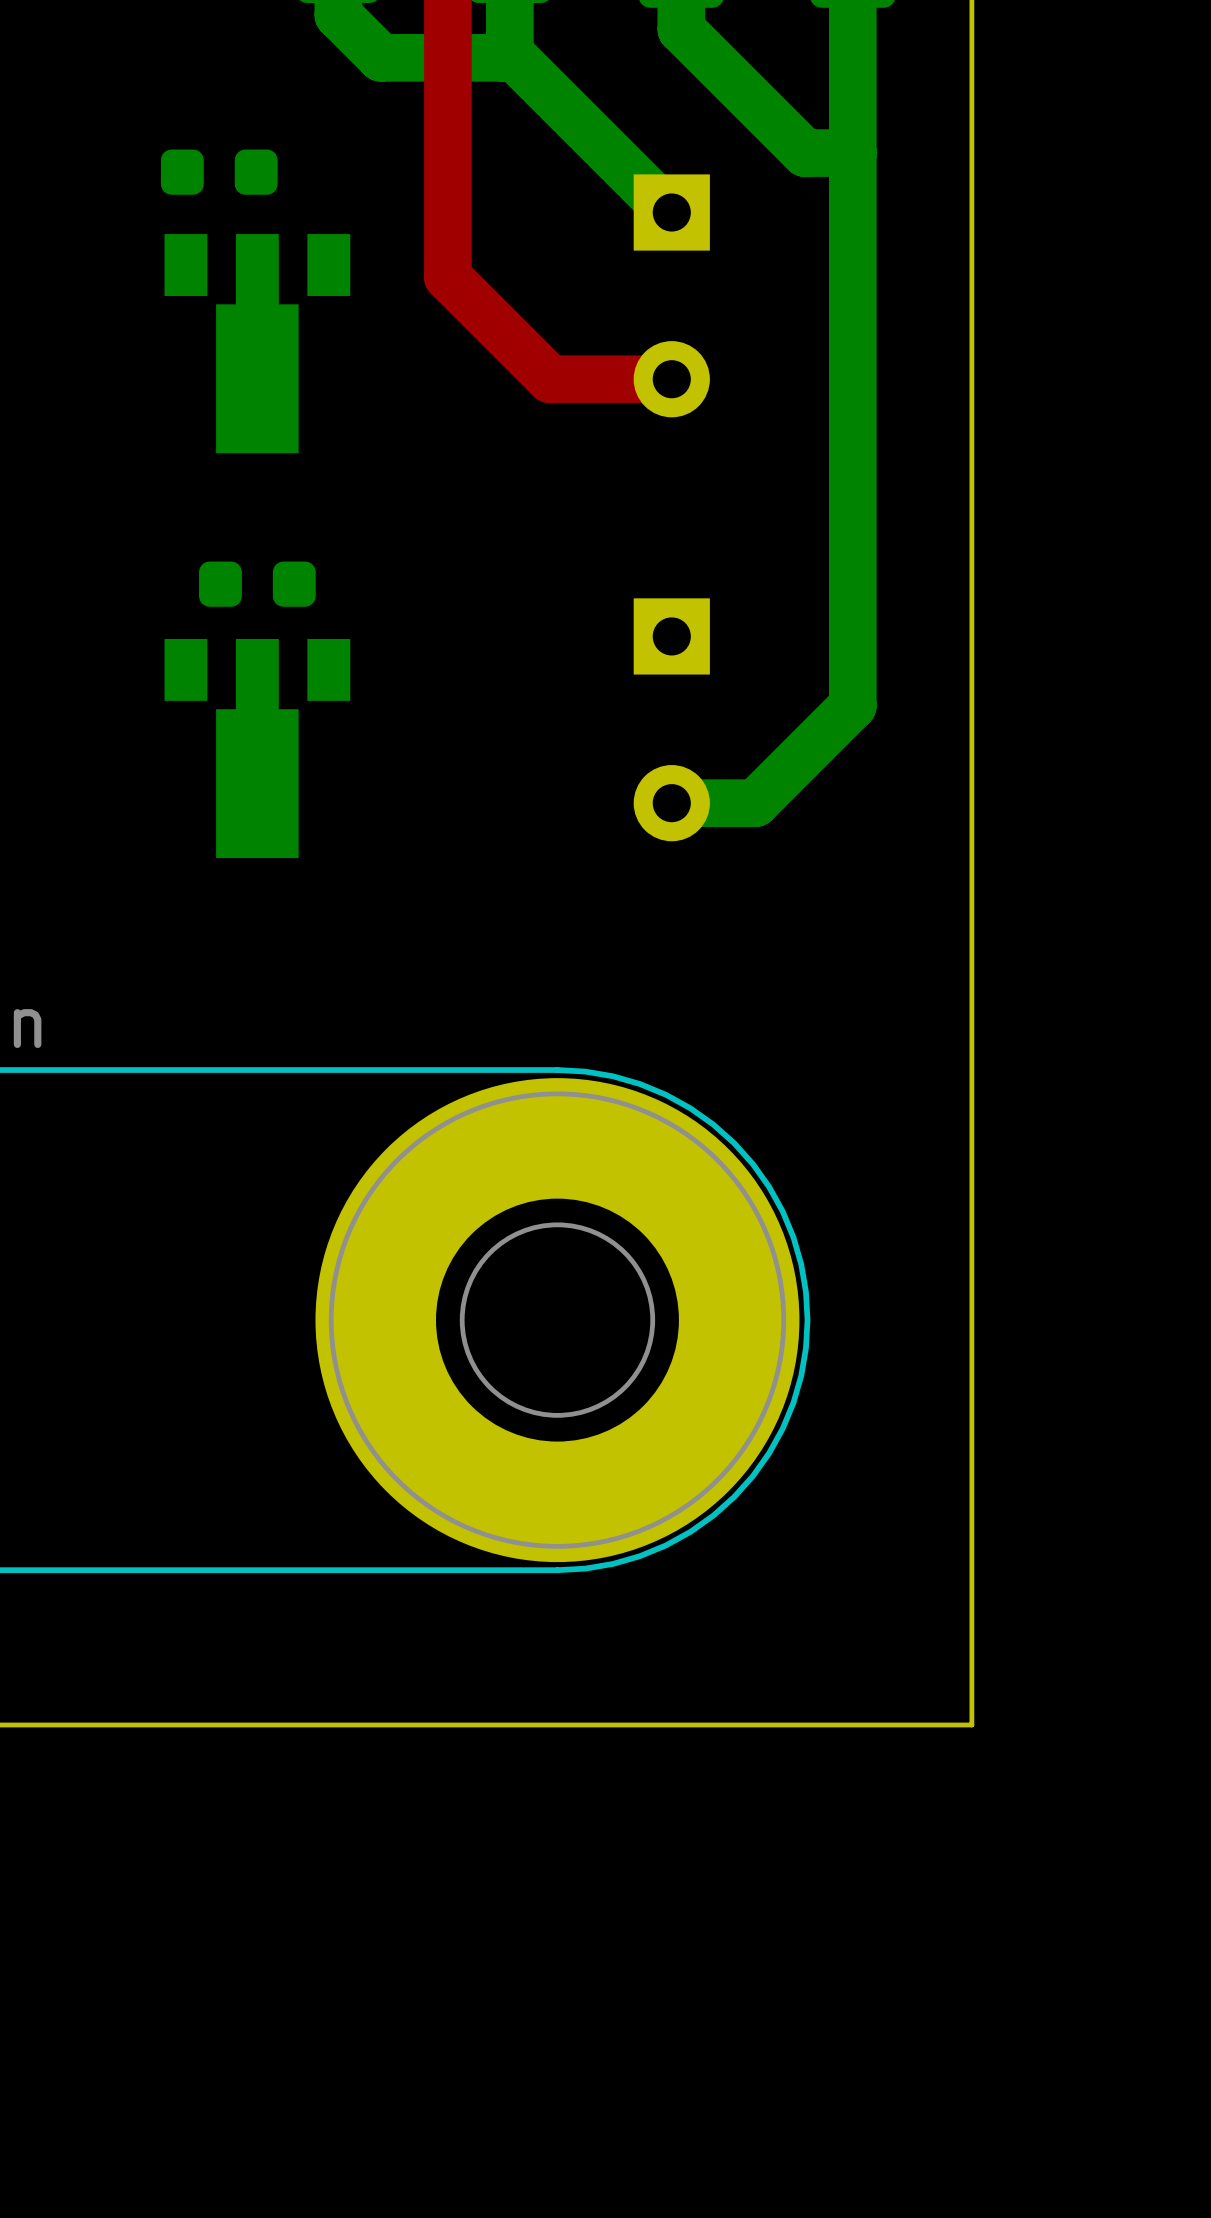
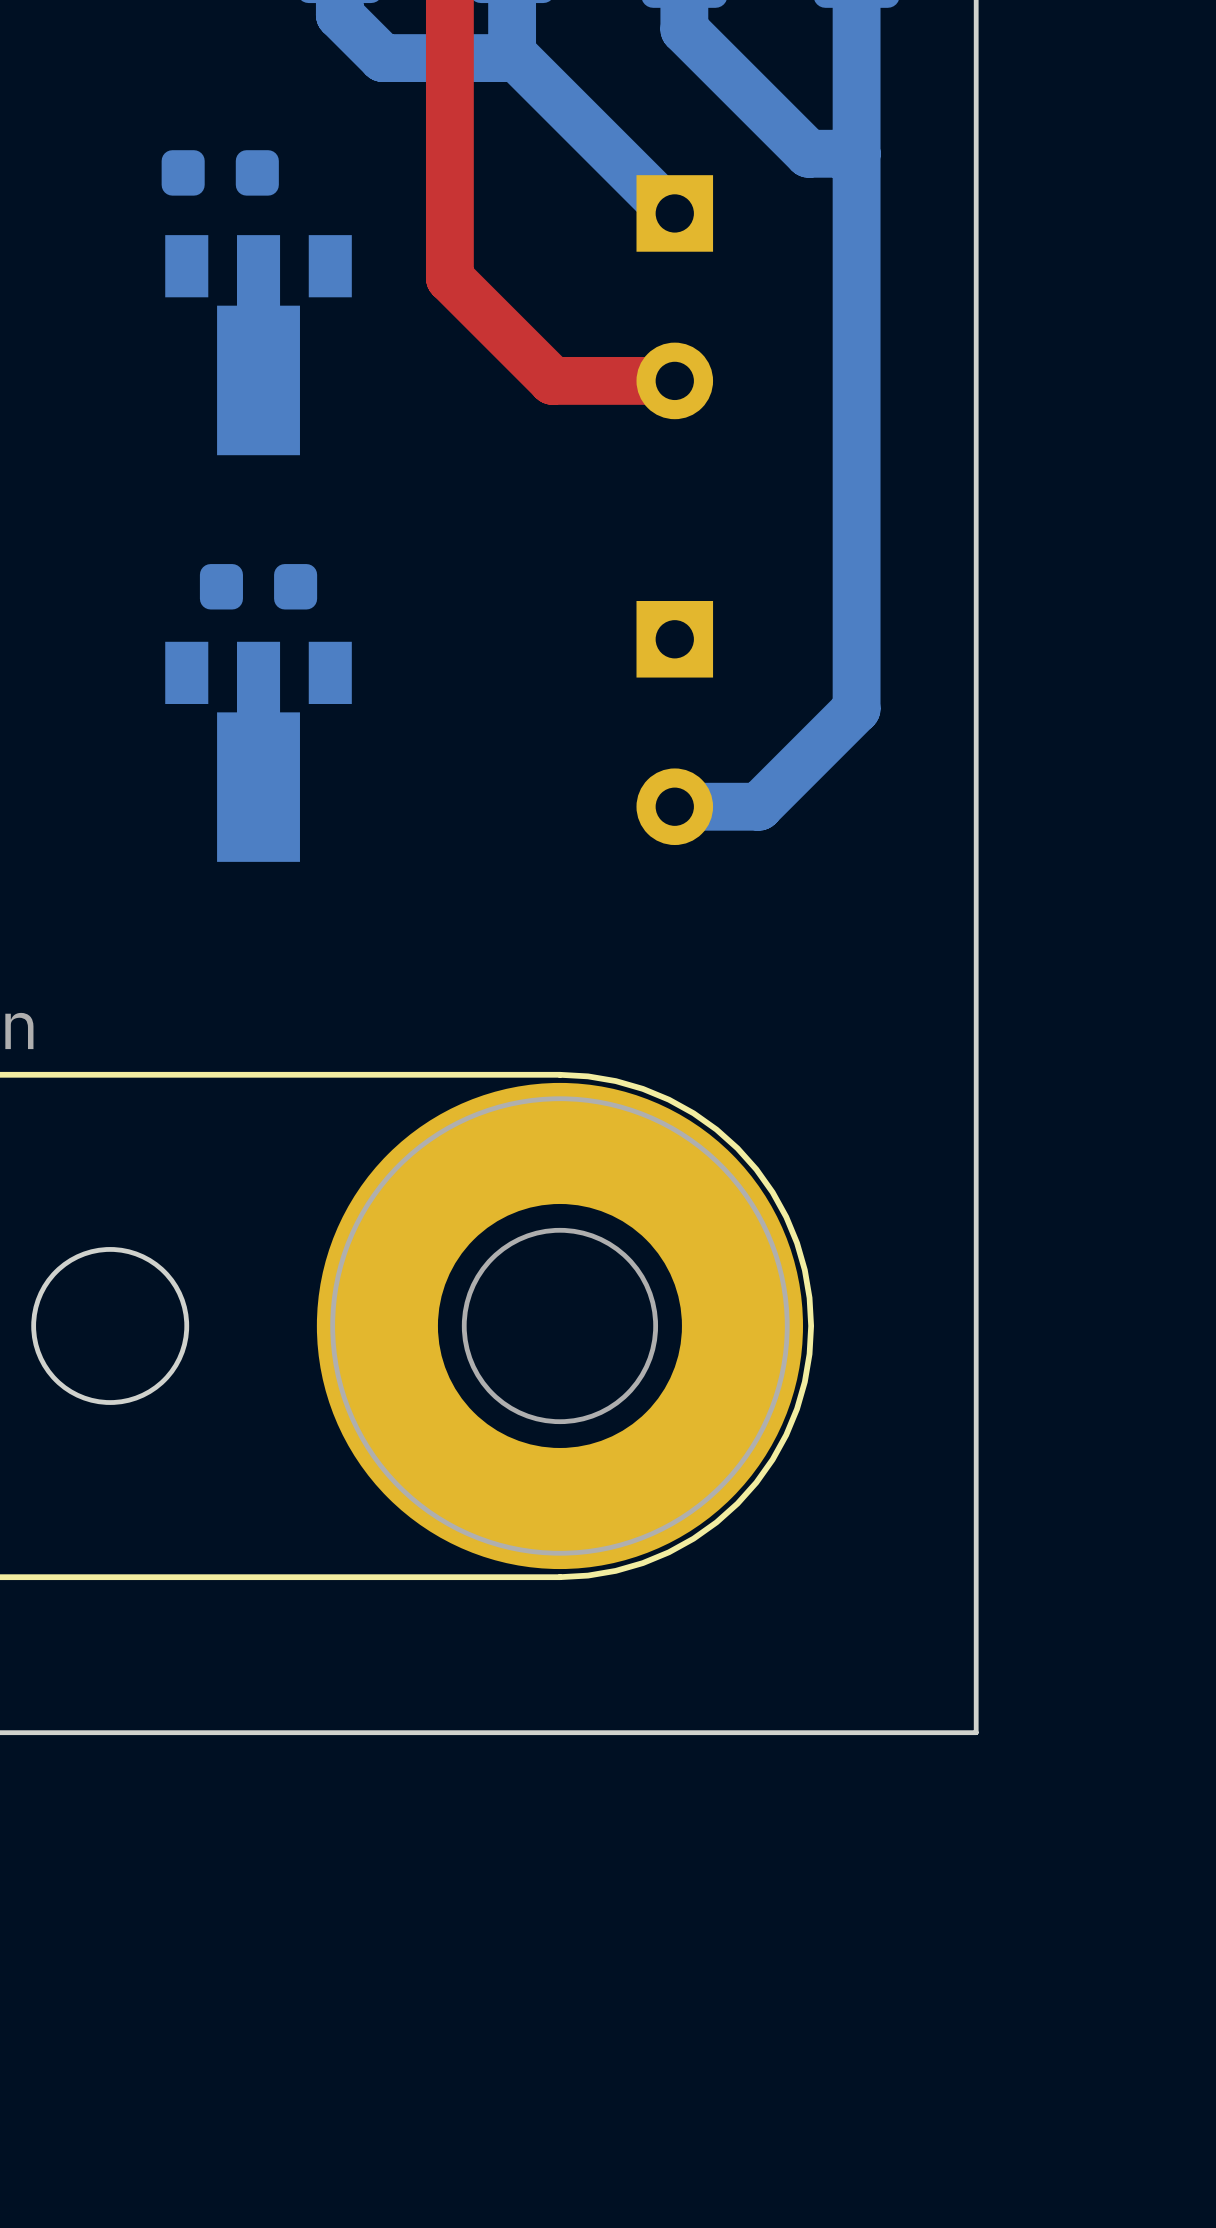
round board edge: none -> [31, 1247, 190, 1405]

